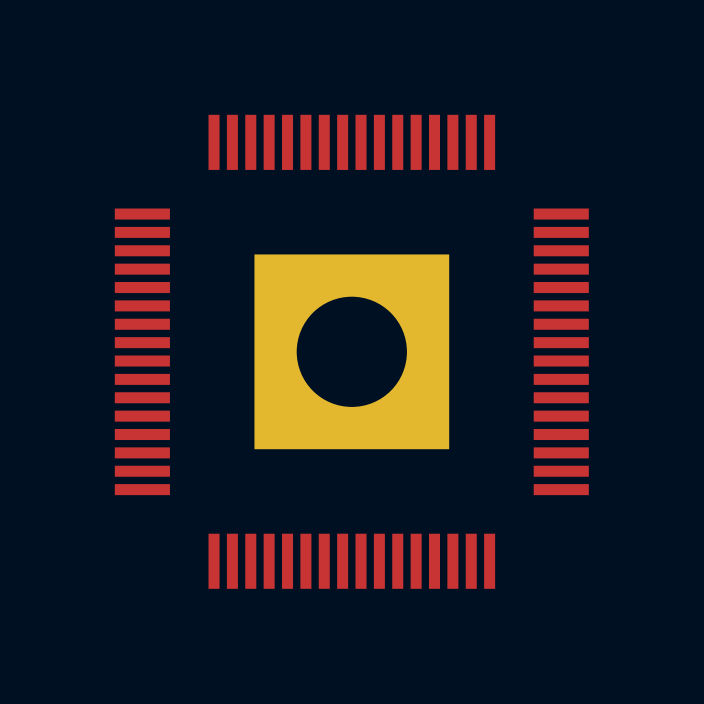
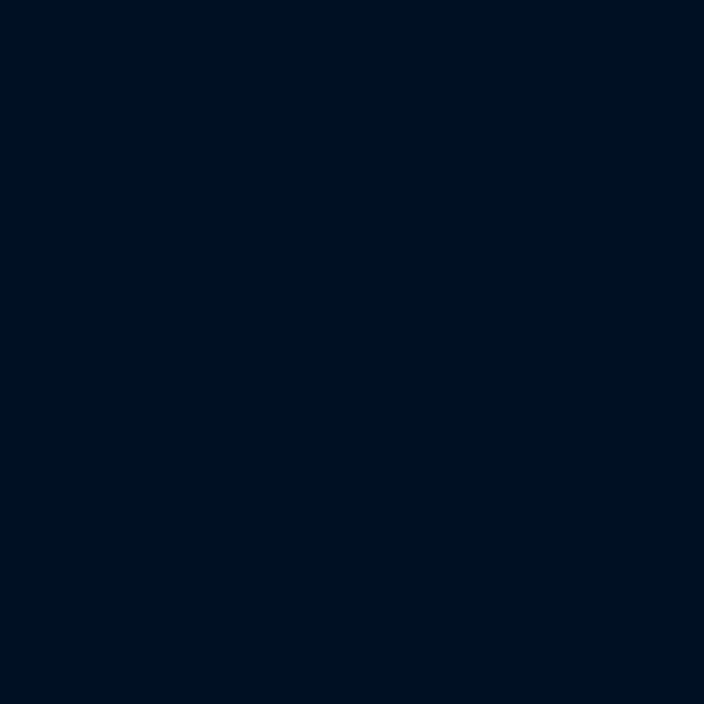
part: (351, 351) -> none

